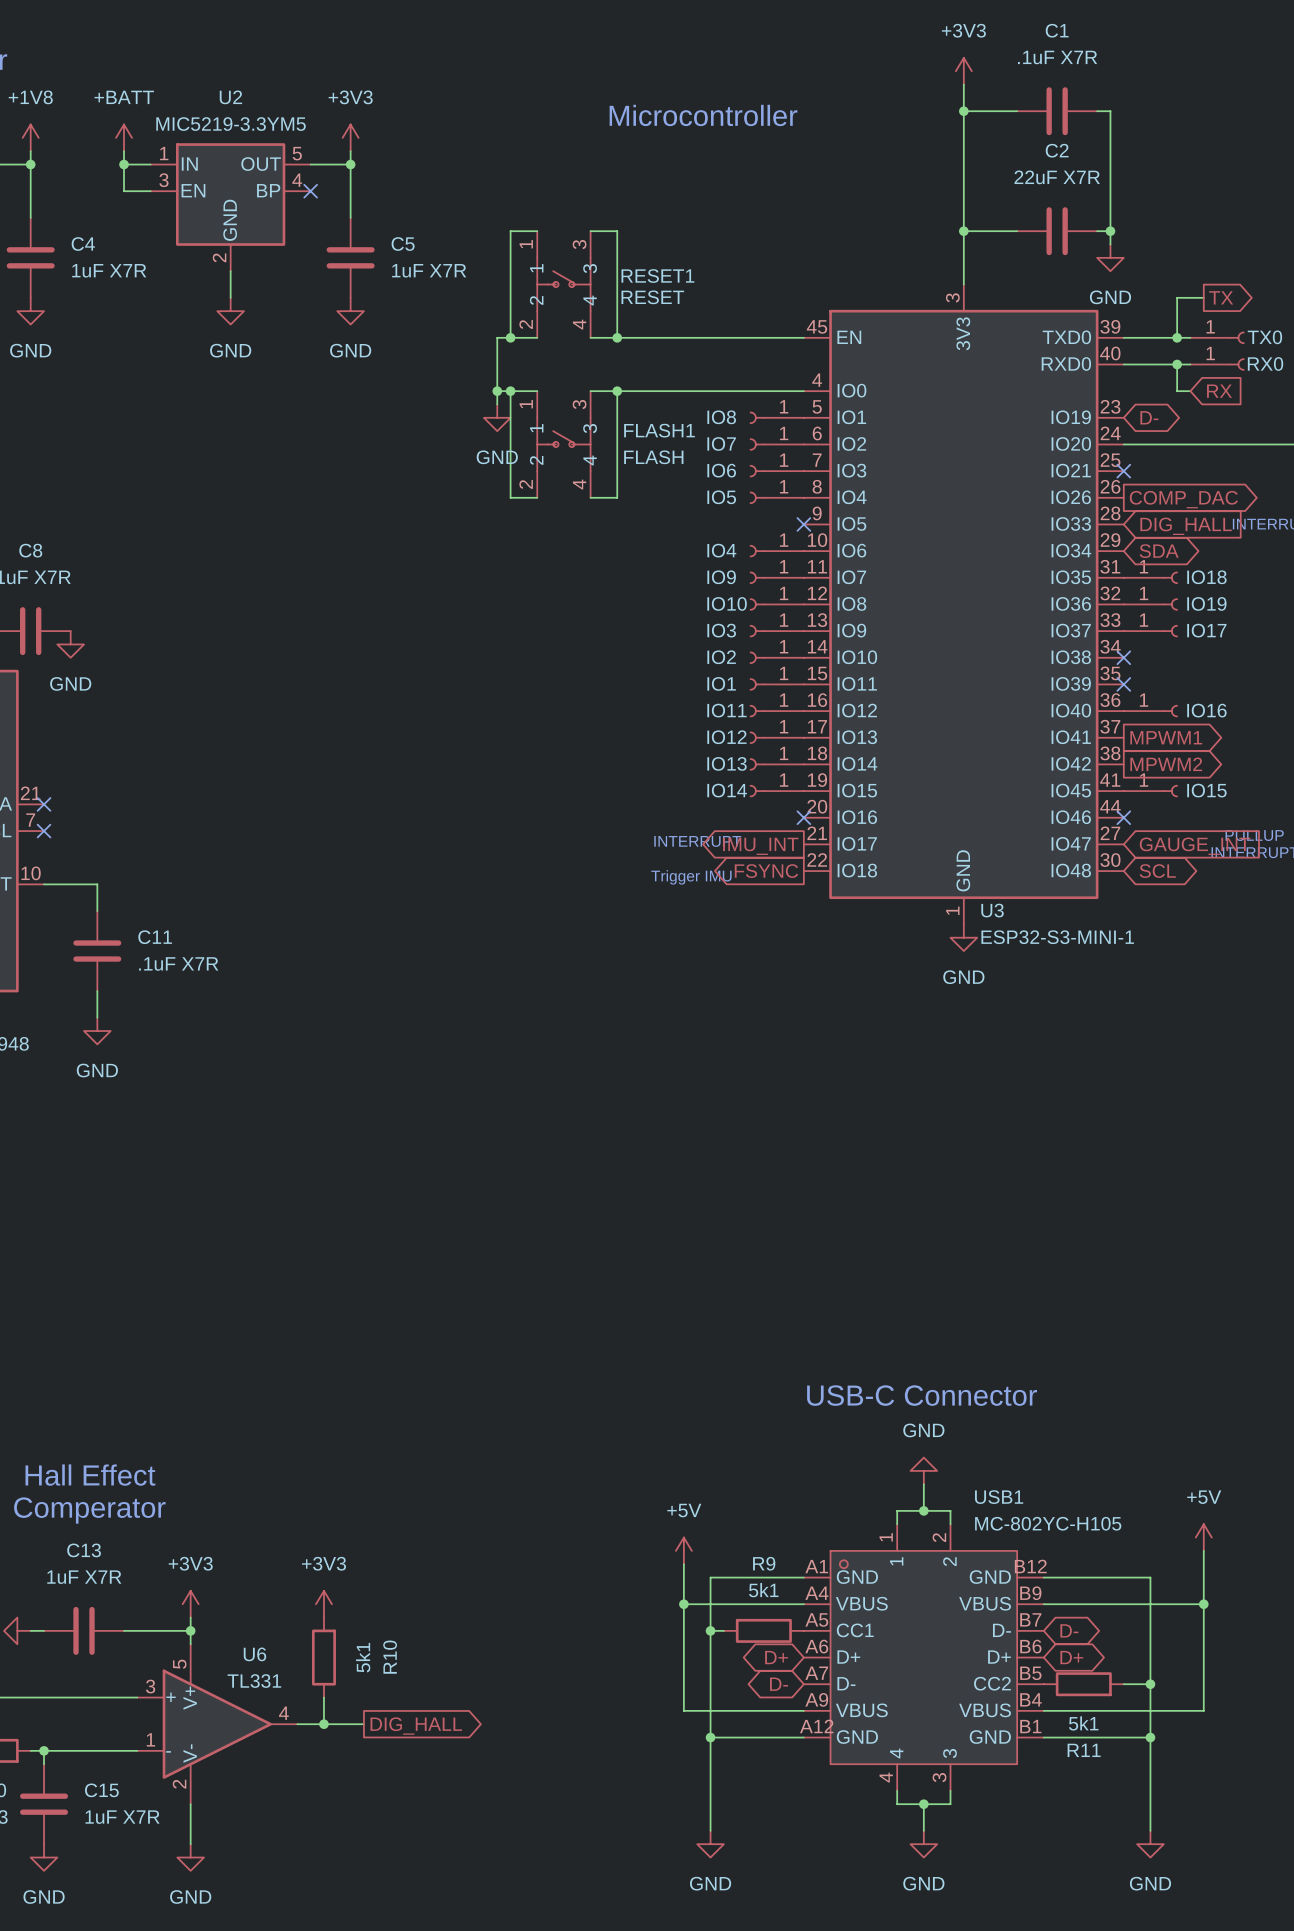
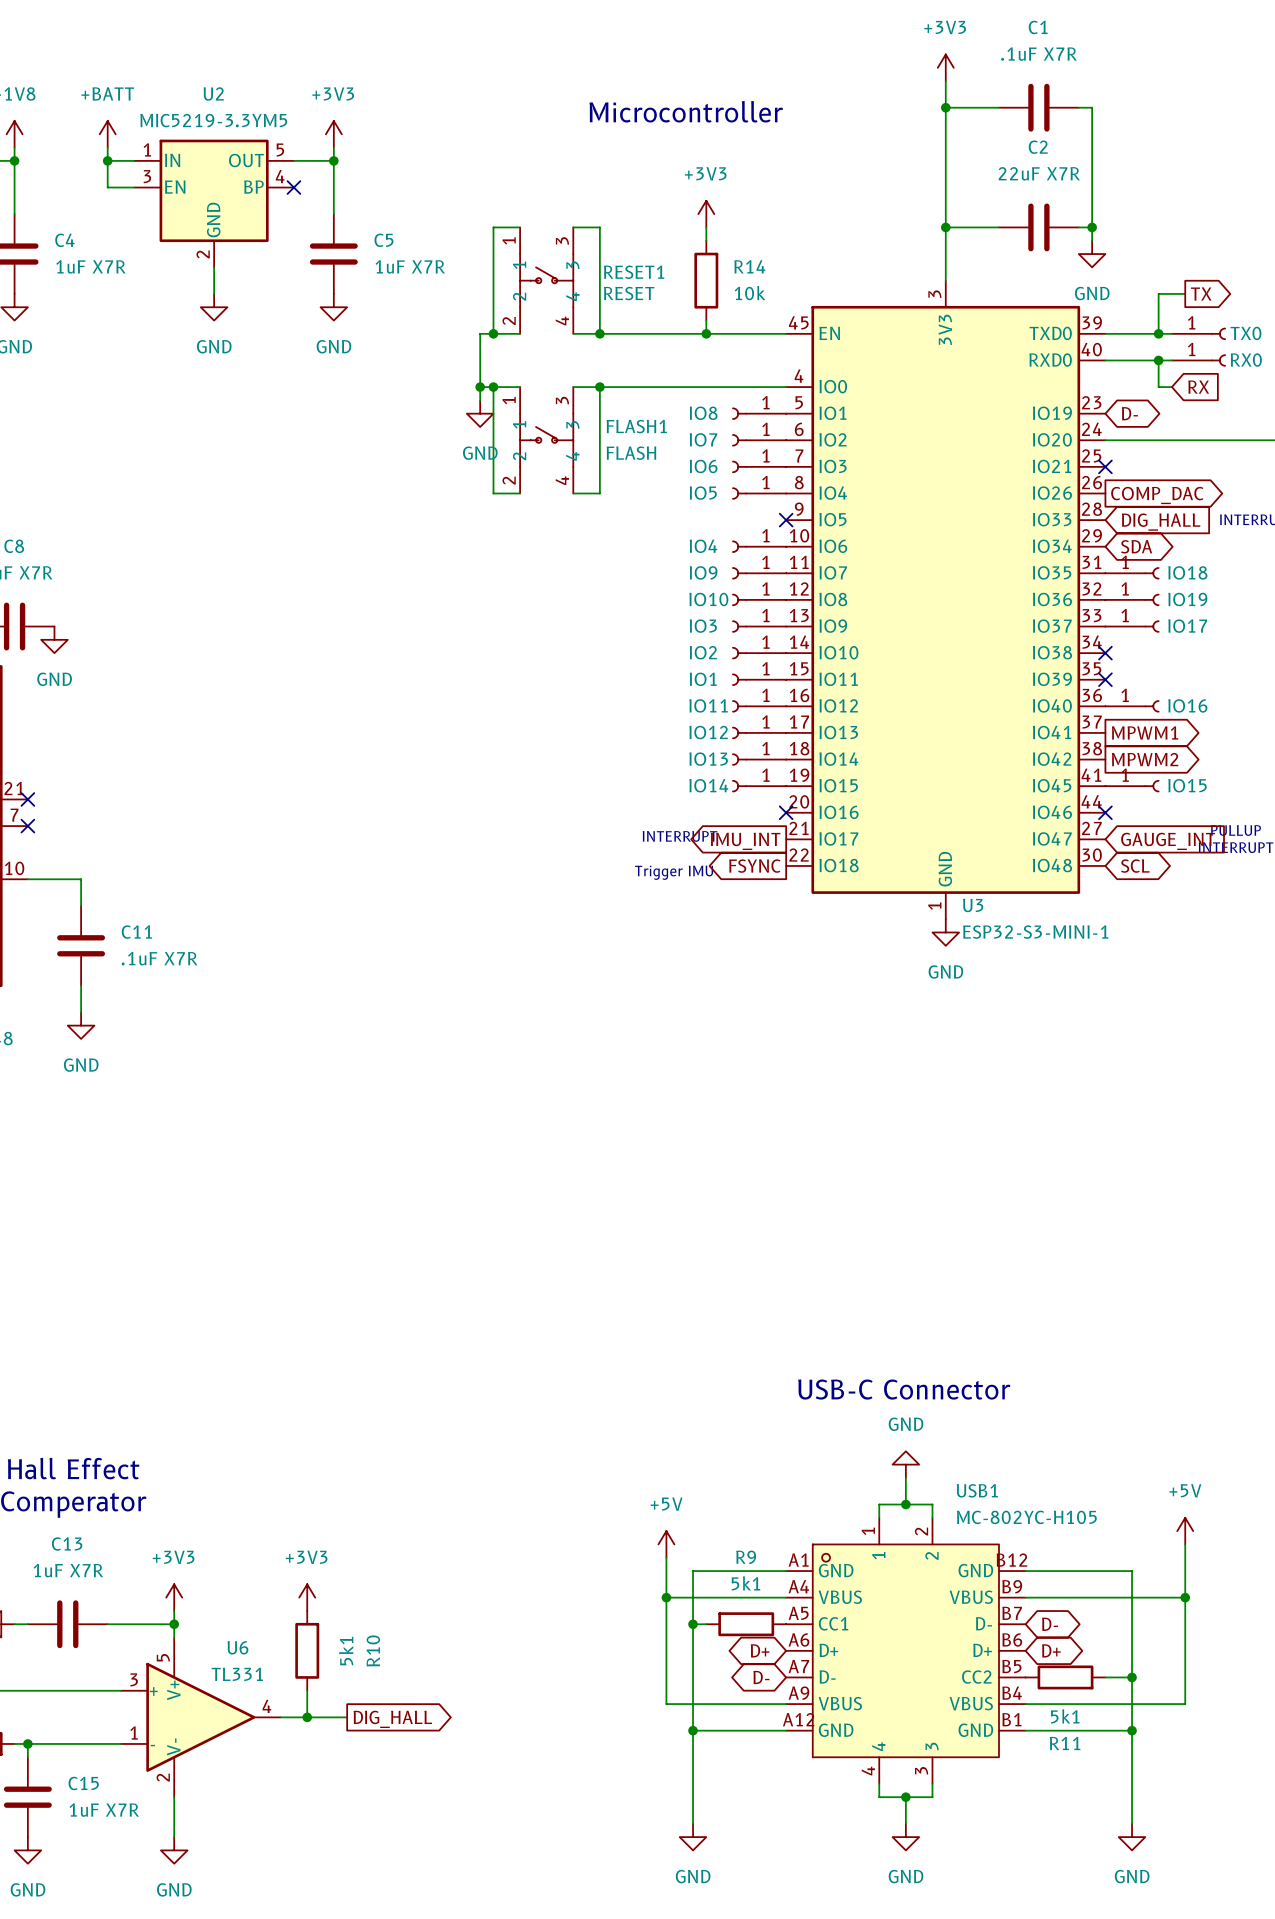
power symbol: none -> +3V3 (706, 214)
wire: none -> (706, 227) (706, 240)
R14: none -> 10k (706, 280)
wire: none -> (706, 320) (706, 333)
junction: none -> (706, 333)

